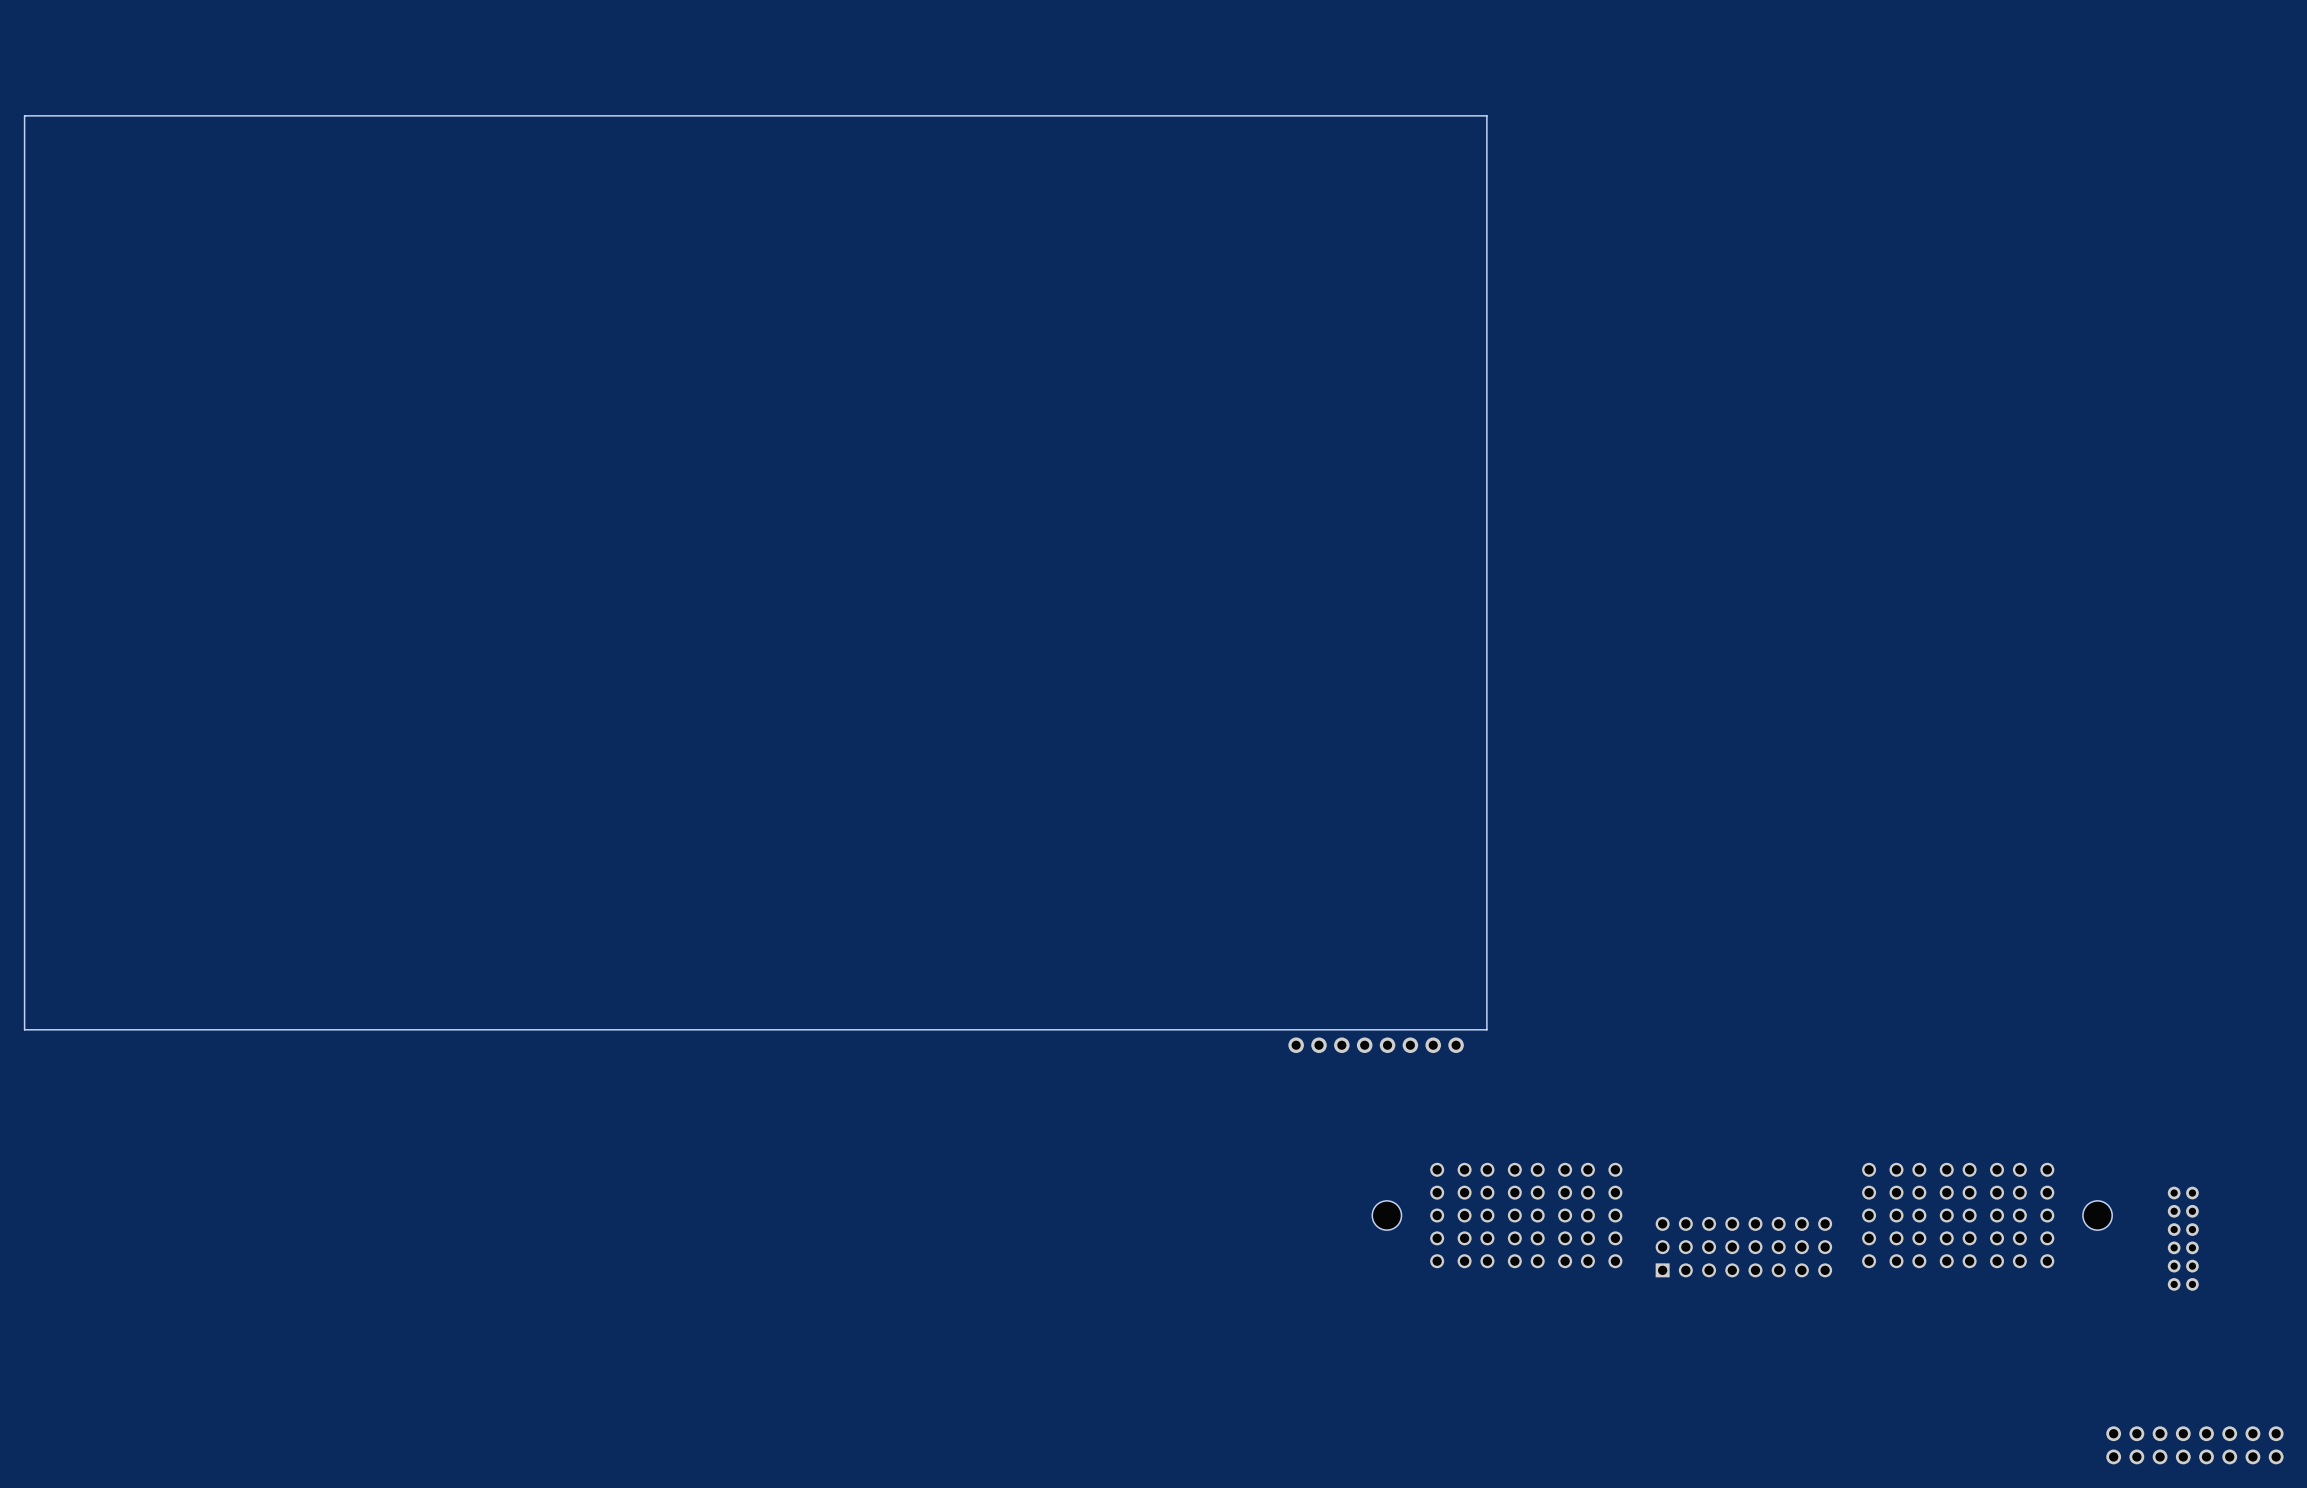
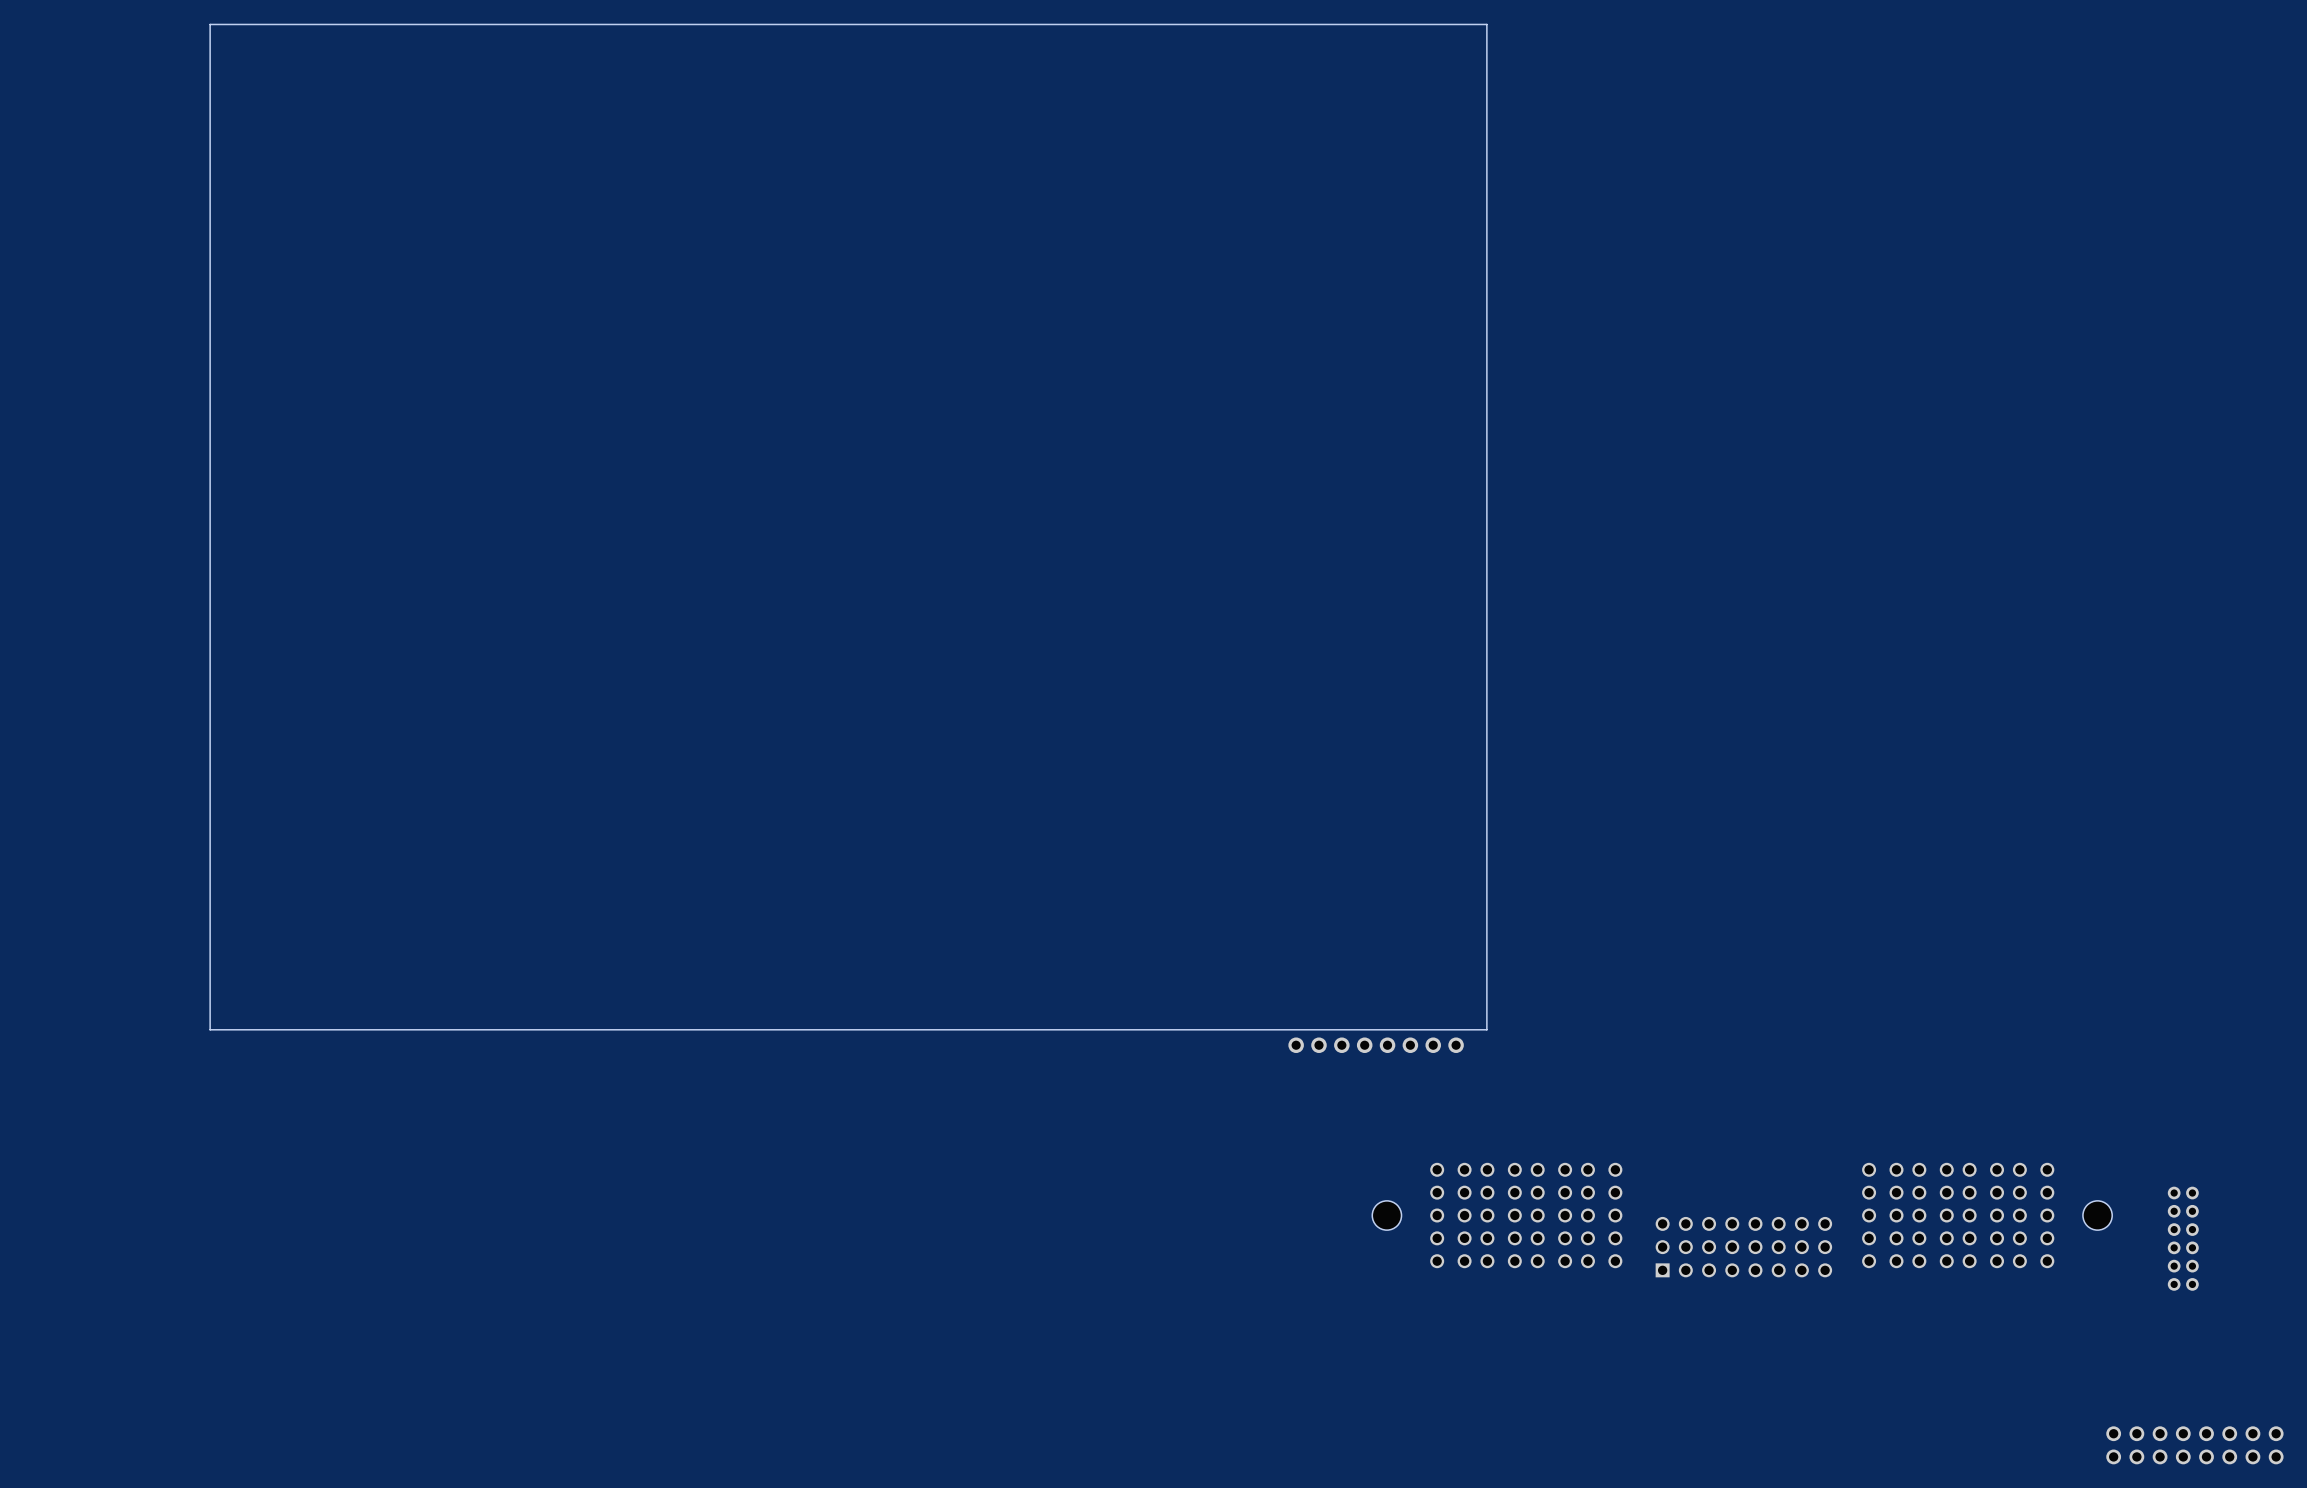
board edge: (1486, 115) (24, 115) (24, 1029) (210, 1029) -> (1486, 115) (1486, 24) (210, 24) (210, 1029)

